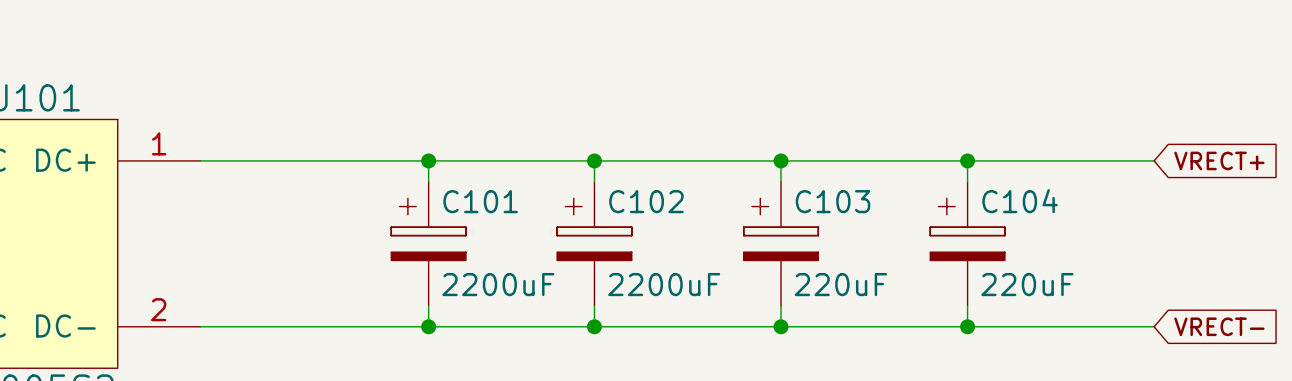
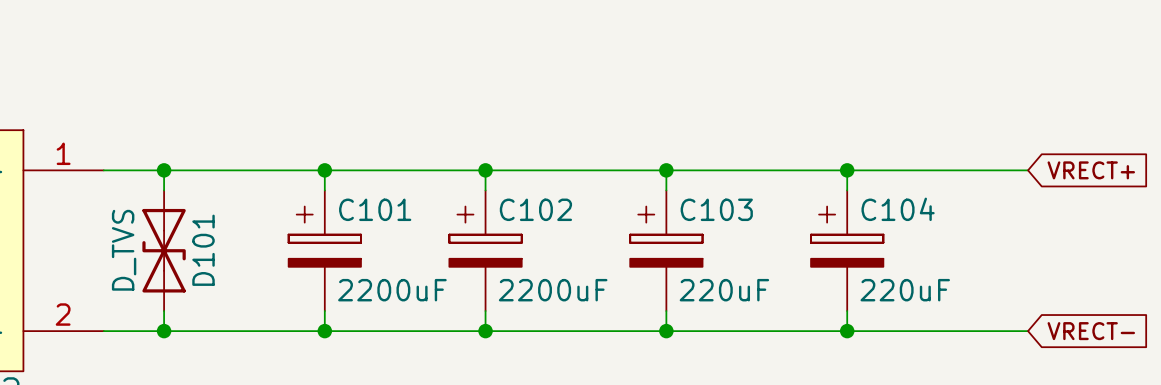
wire: none -> (164, 170) (164, 190)
junction: none -> (164, 170)
D101: none -> D_TVS (164, 250)
wire: none -> (164, 311) (164, 331)
junction: none -> (164, 331)

